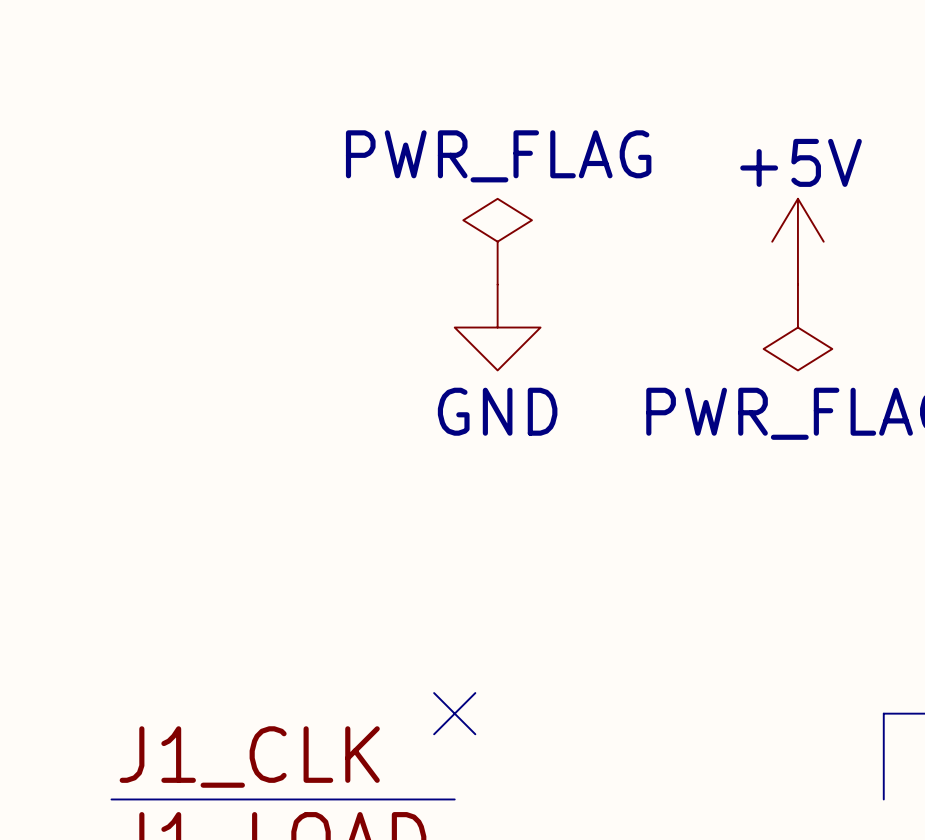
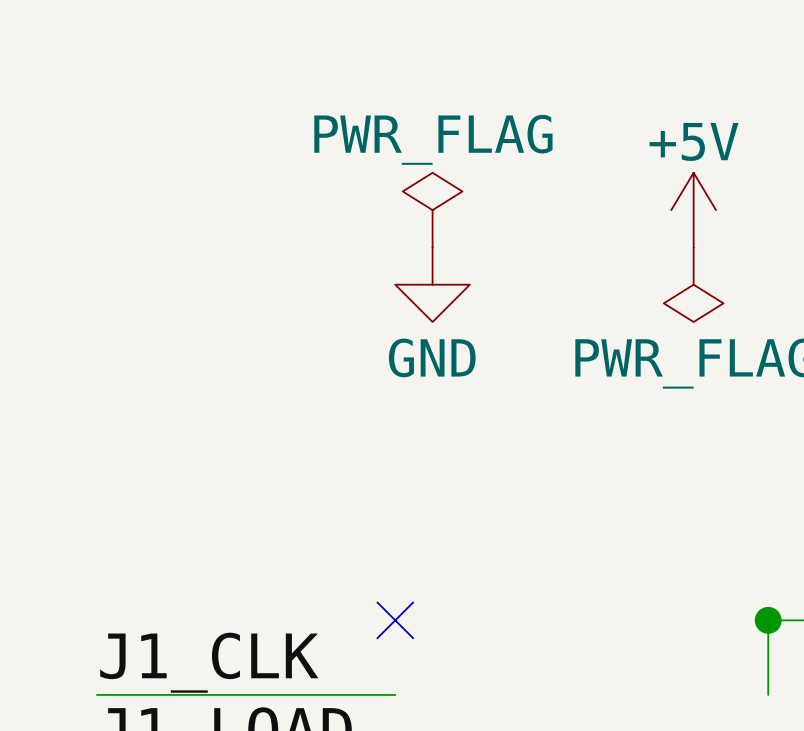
junction: none -> (768, 620)

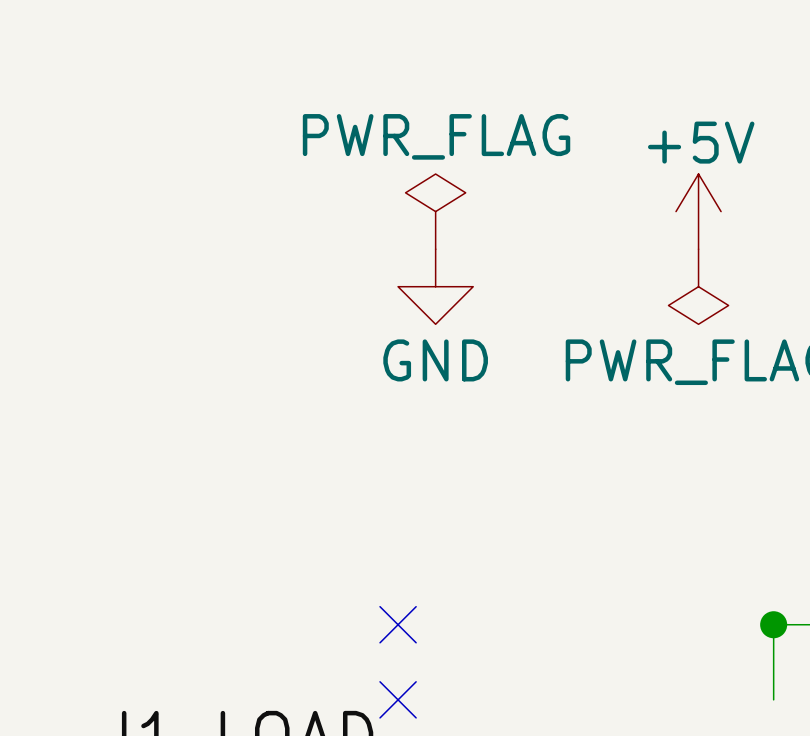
label: J1_CLK (209, 662) -> none
wire: (96, 694) (395, 694) -> none
no-connect mark: none -> (398, 699)

